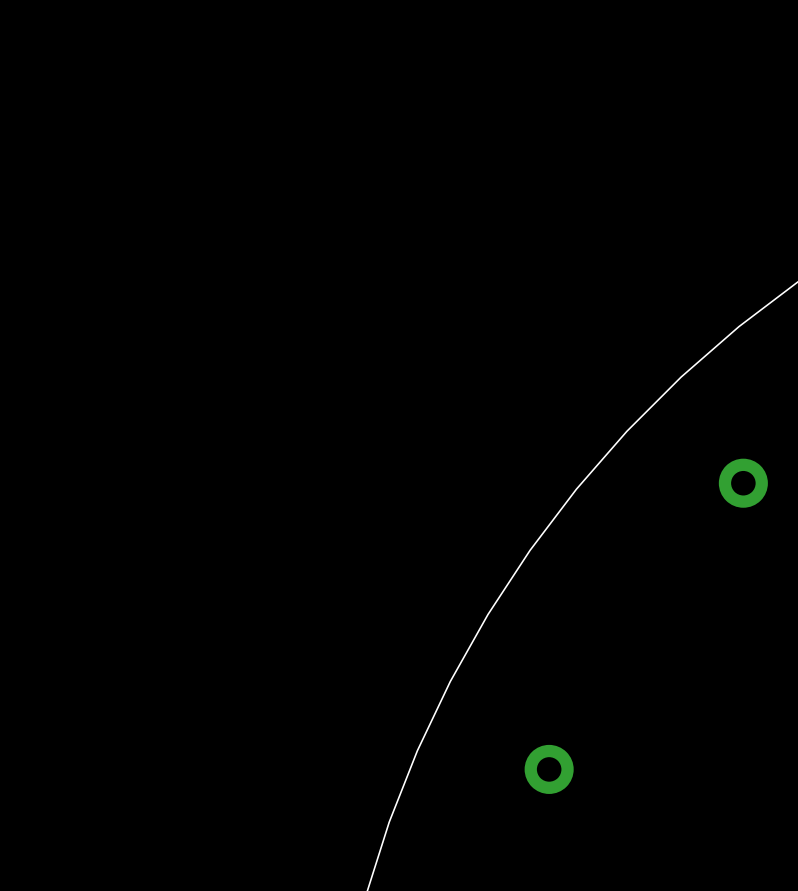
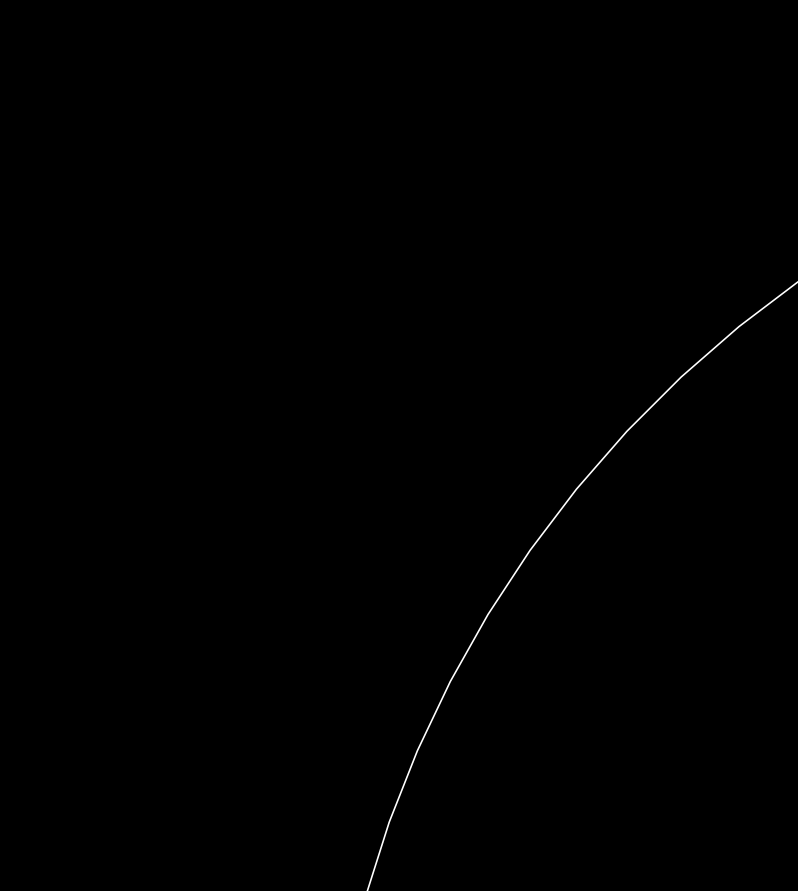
via: (743, 483) -> none
via: (549, 769) -> none

